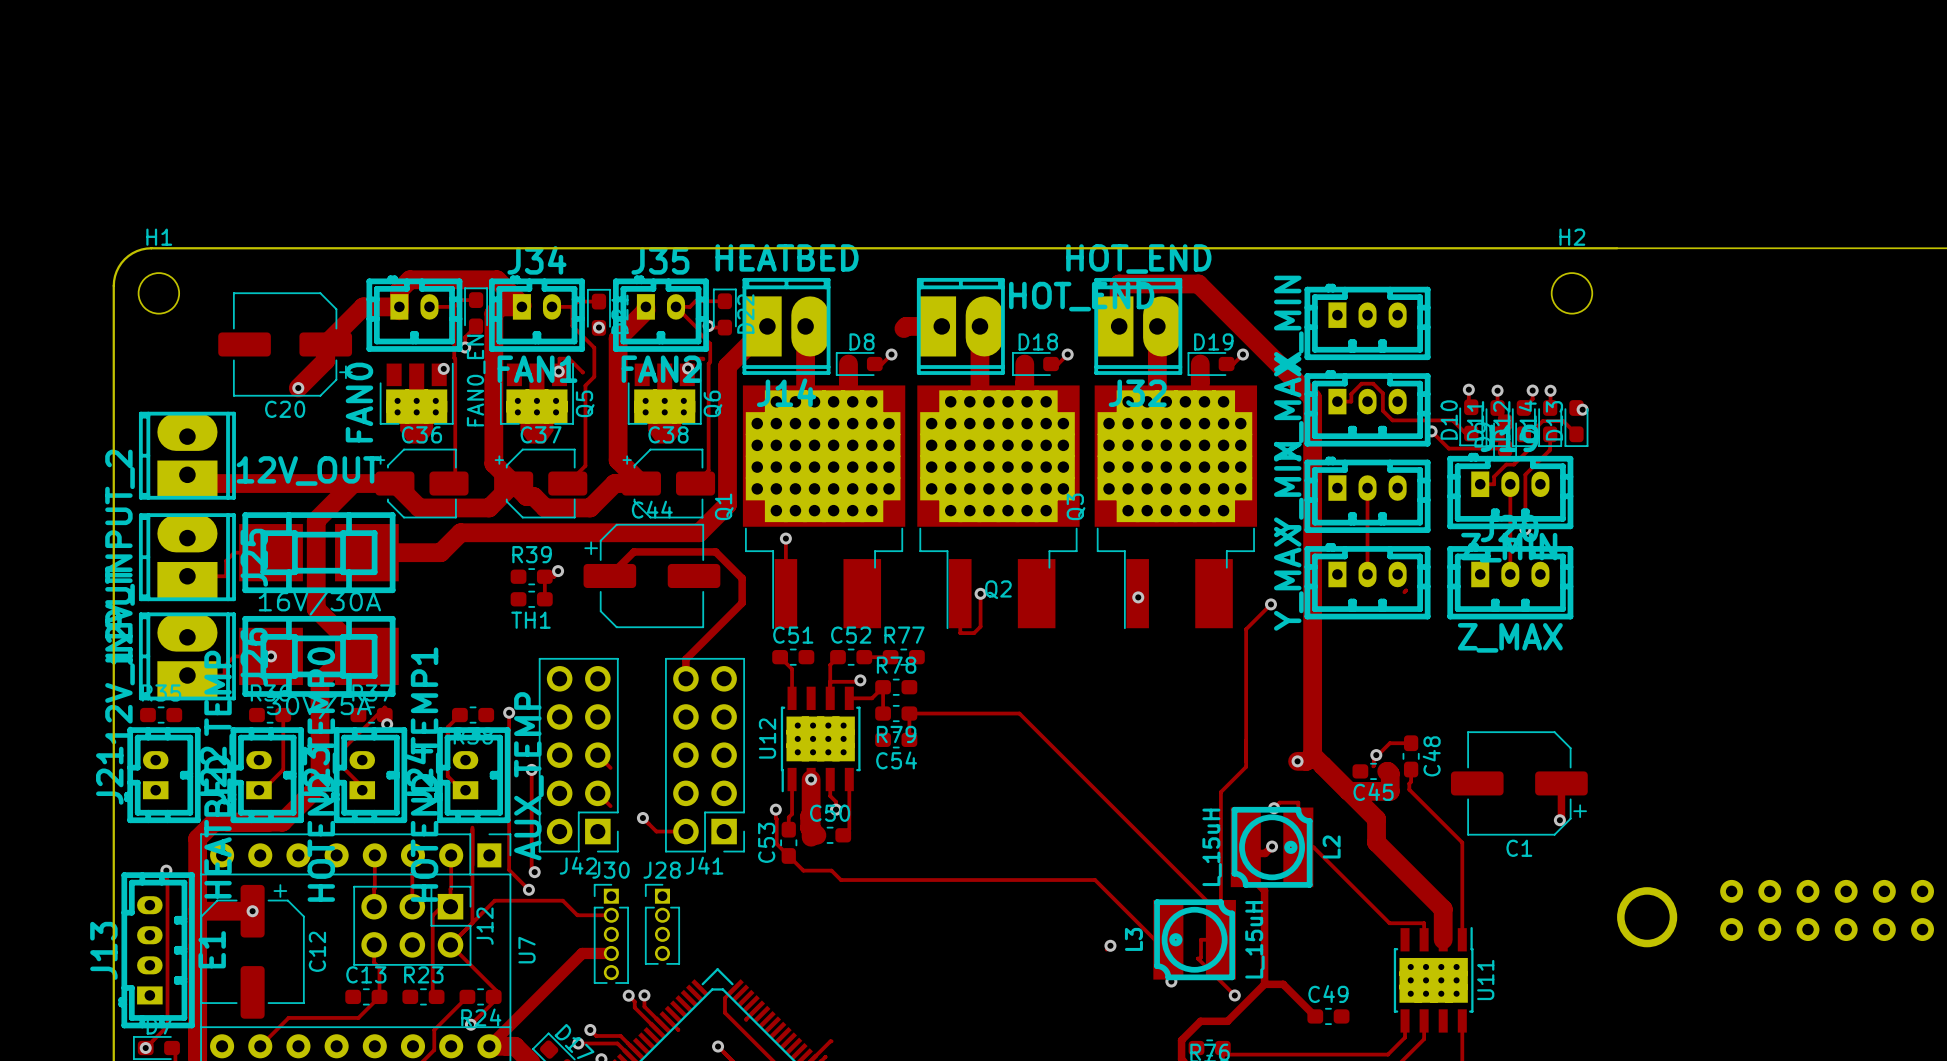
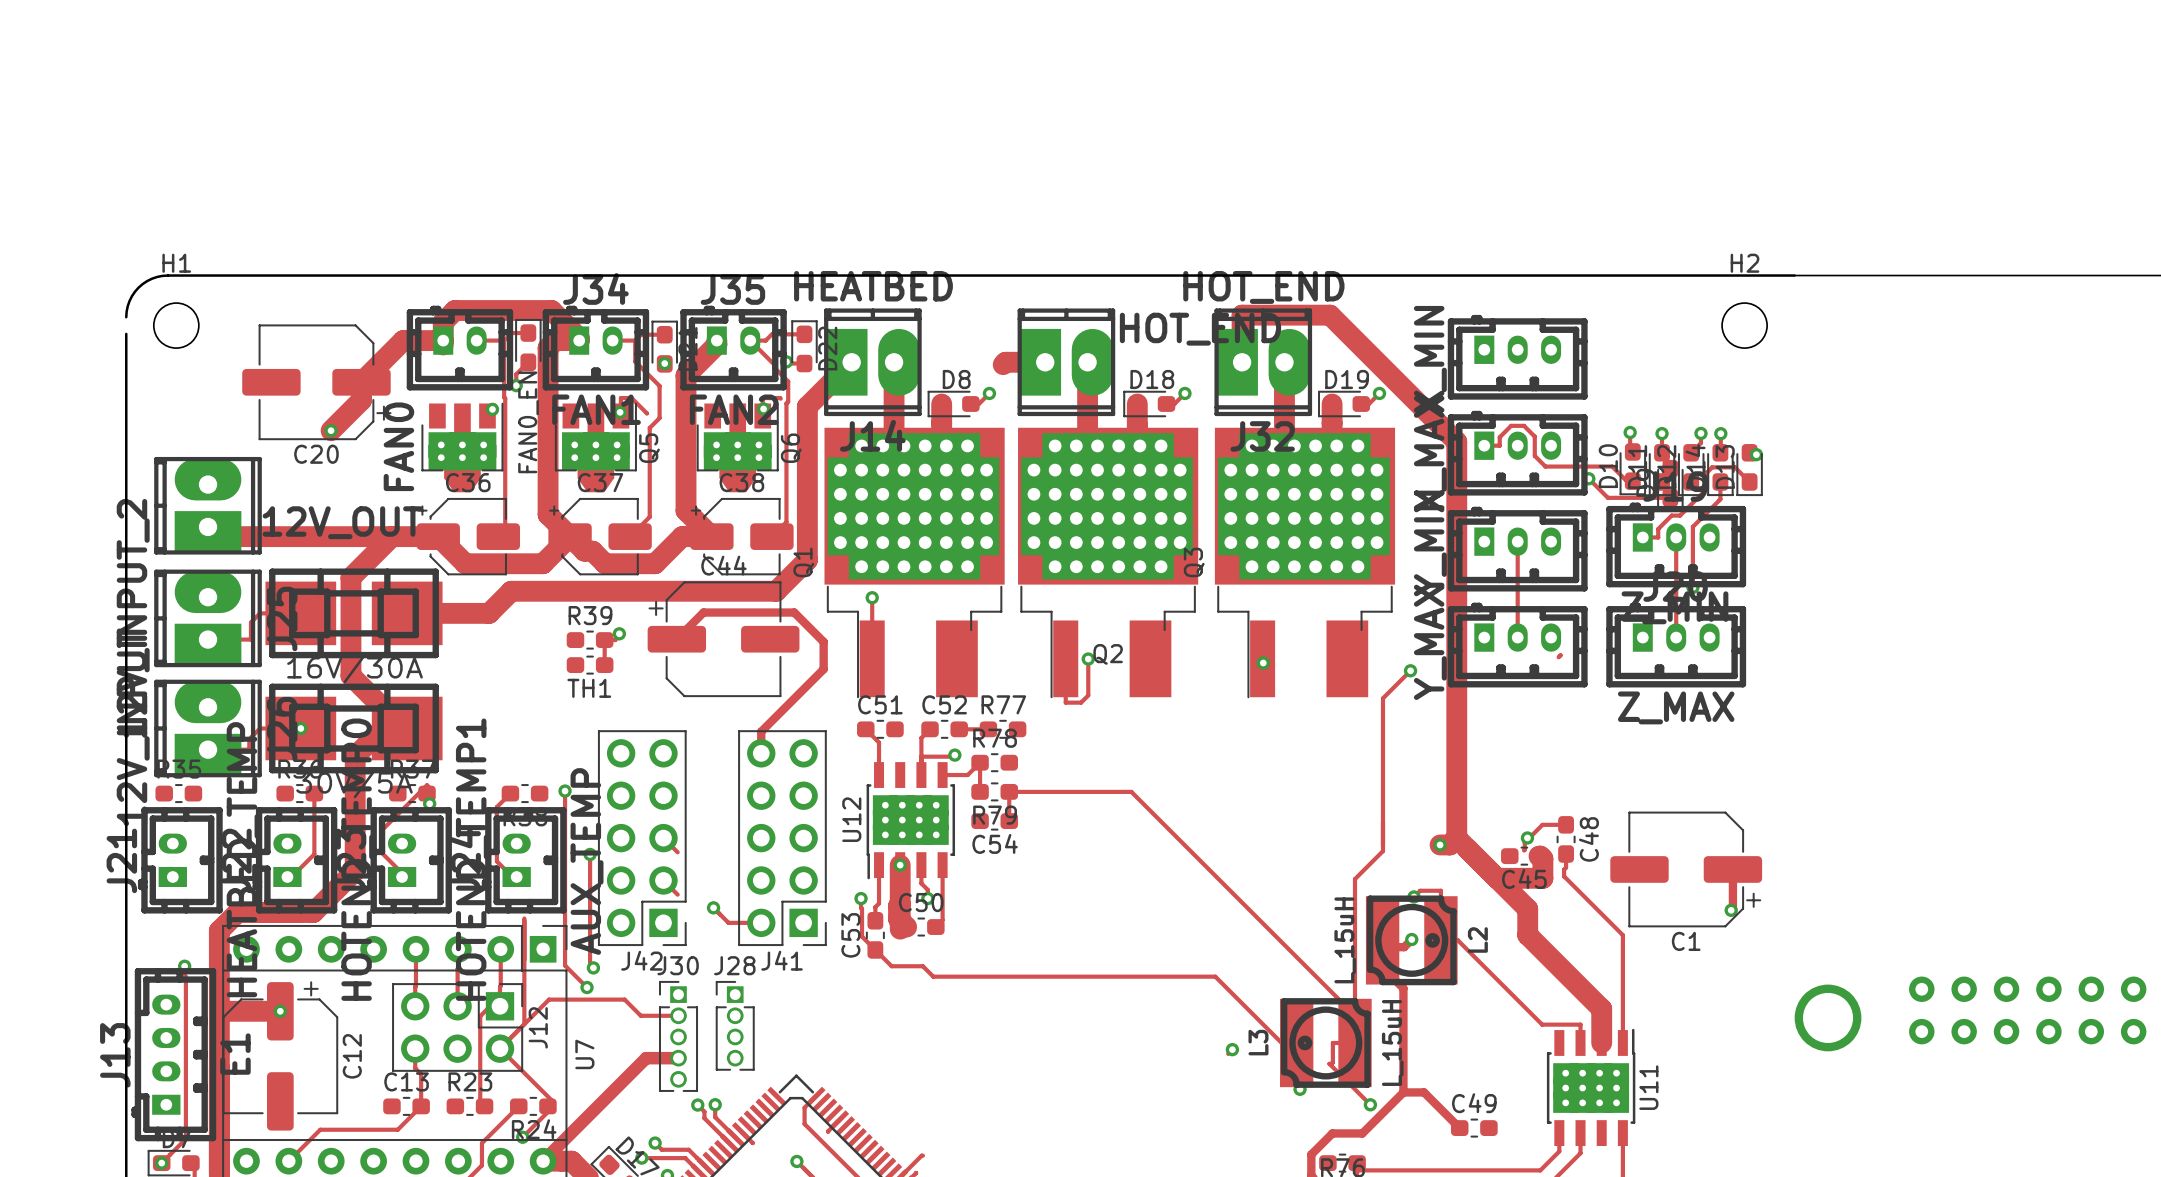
board edge: (113, 285) (113, 300) -> none

